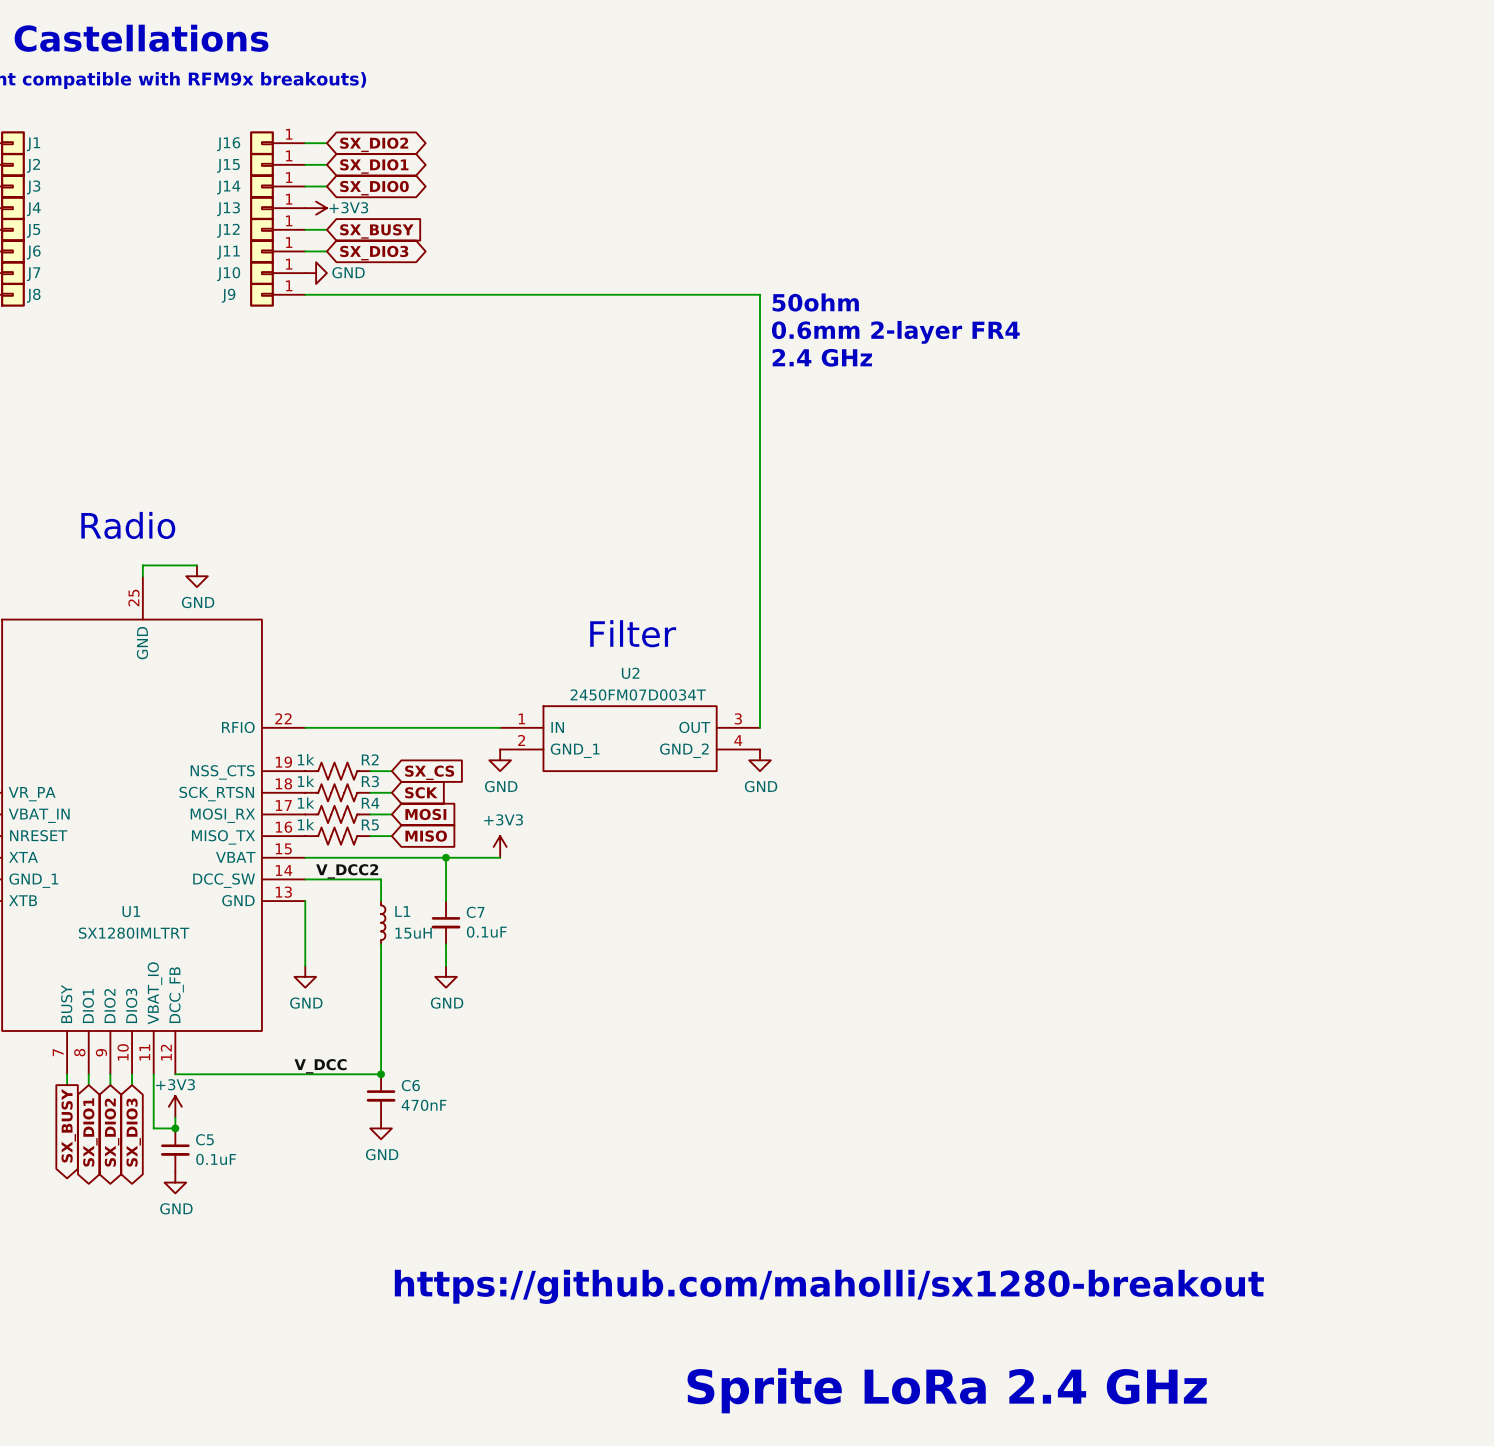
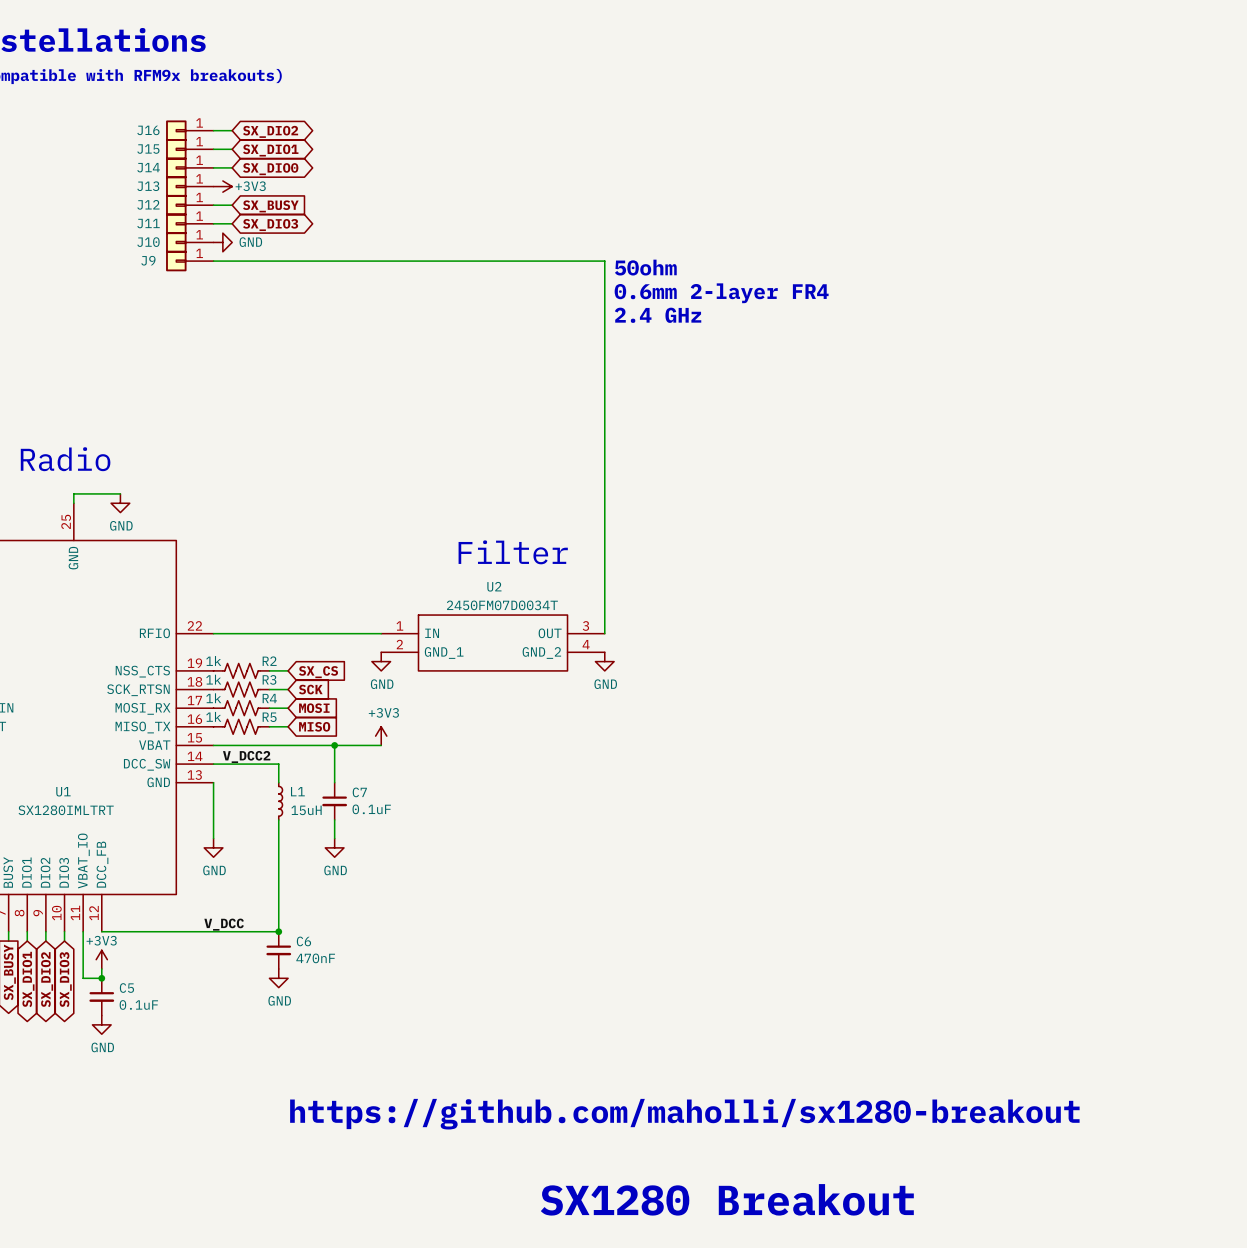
text: Sprite LoRa 2.4 GHz (947, 1390) -> SX1280 Breakout (727, 1199)

